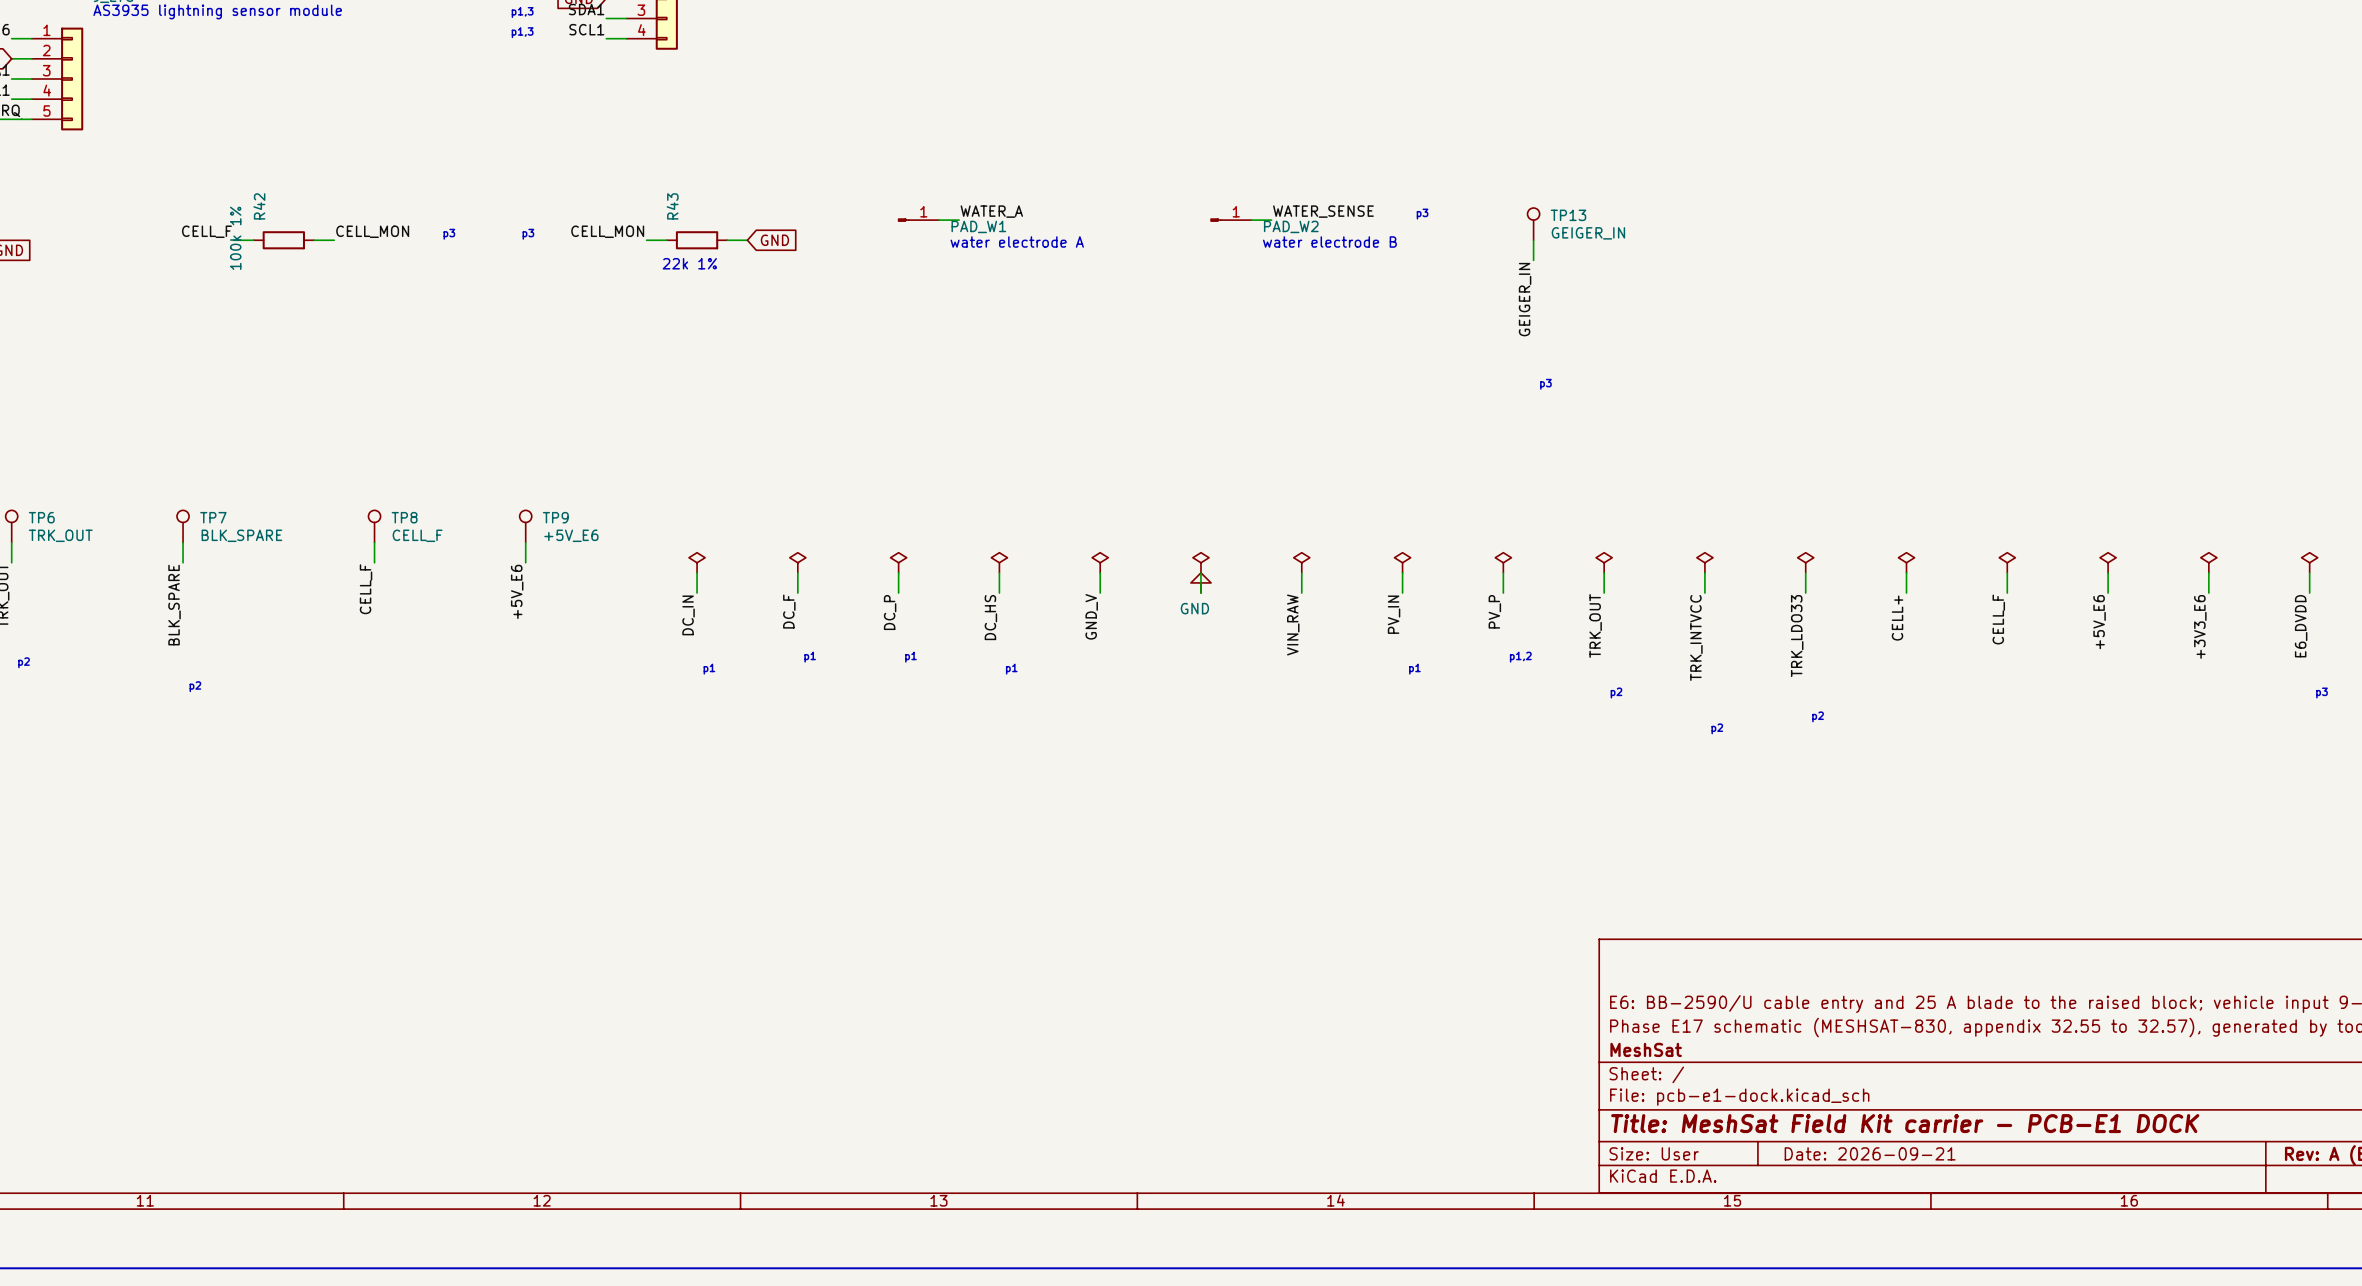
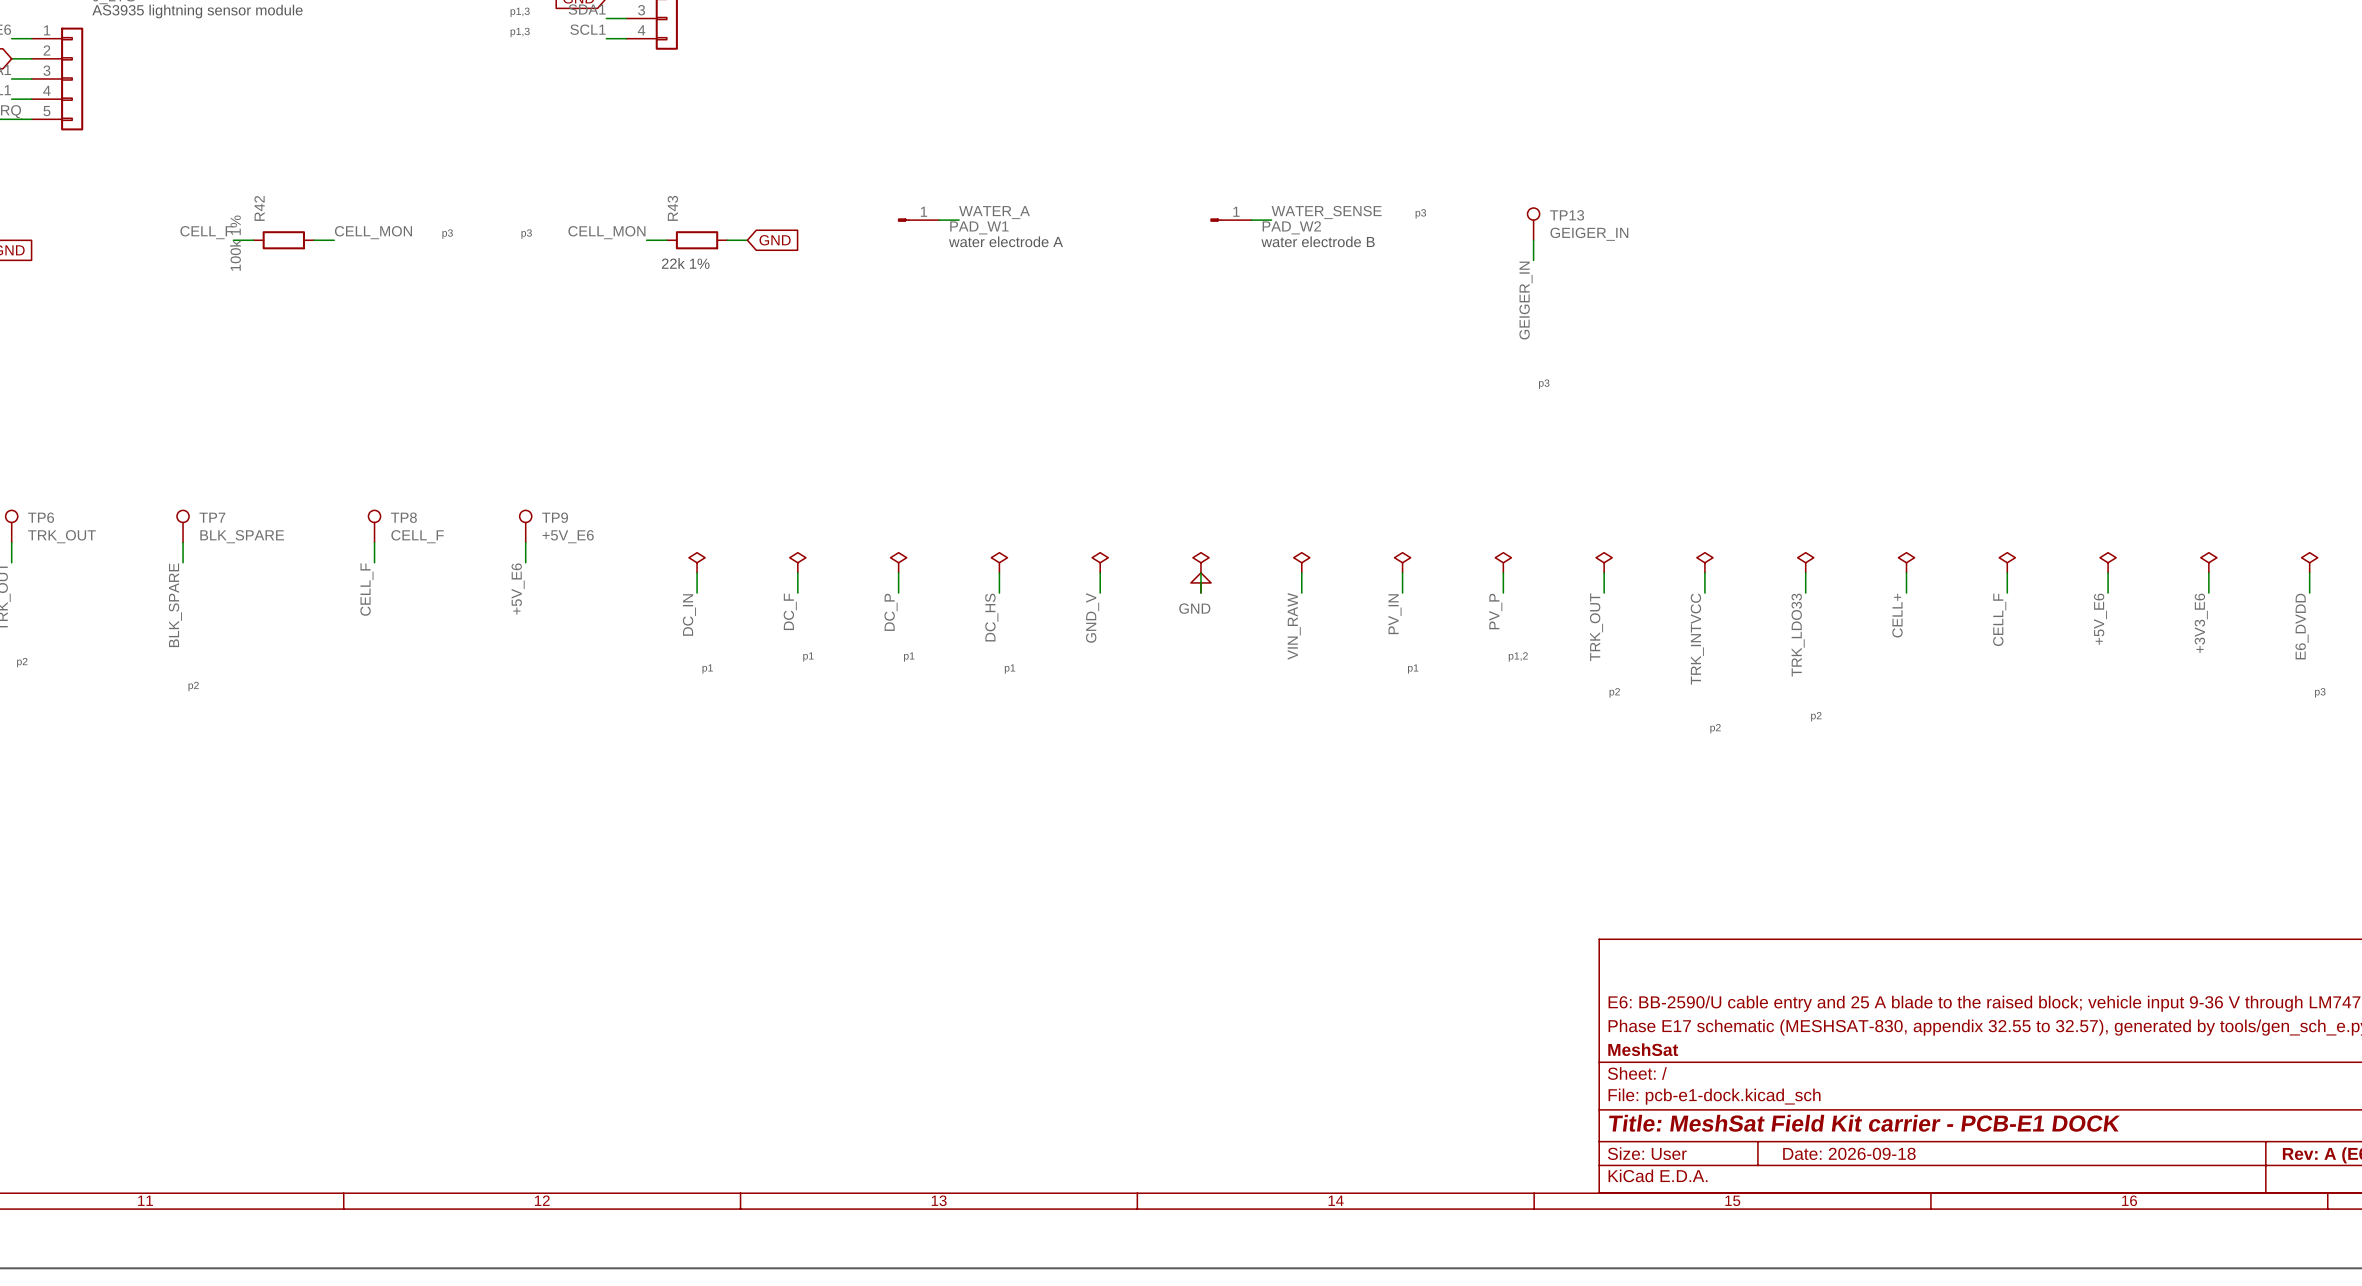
title block: Date: 2026-09-21 (1870, 1153) -> Date: 2026-09-18 (1849, 1153)

